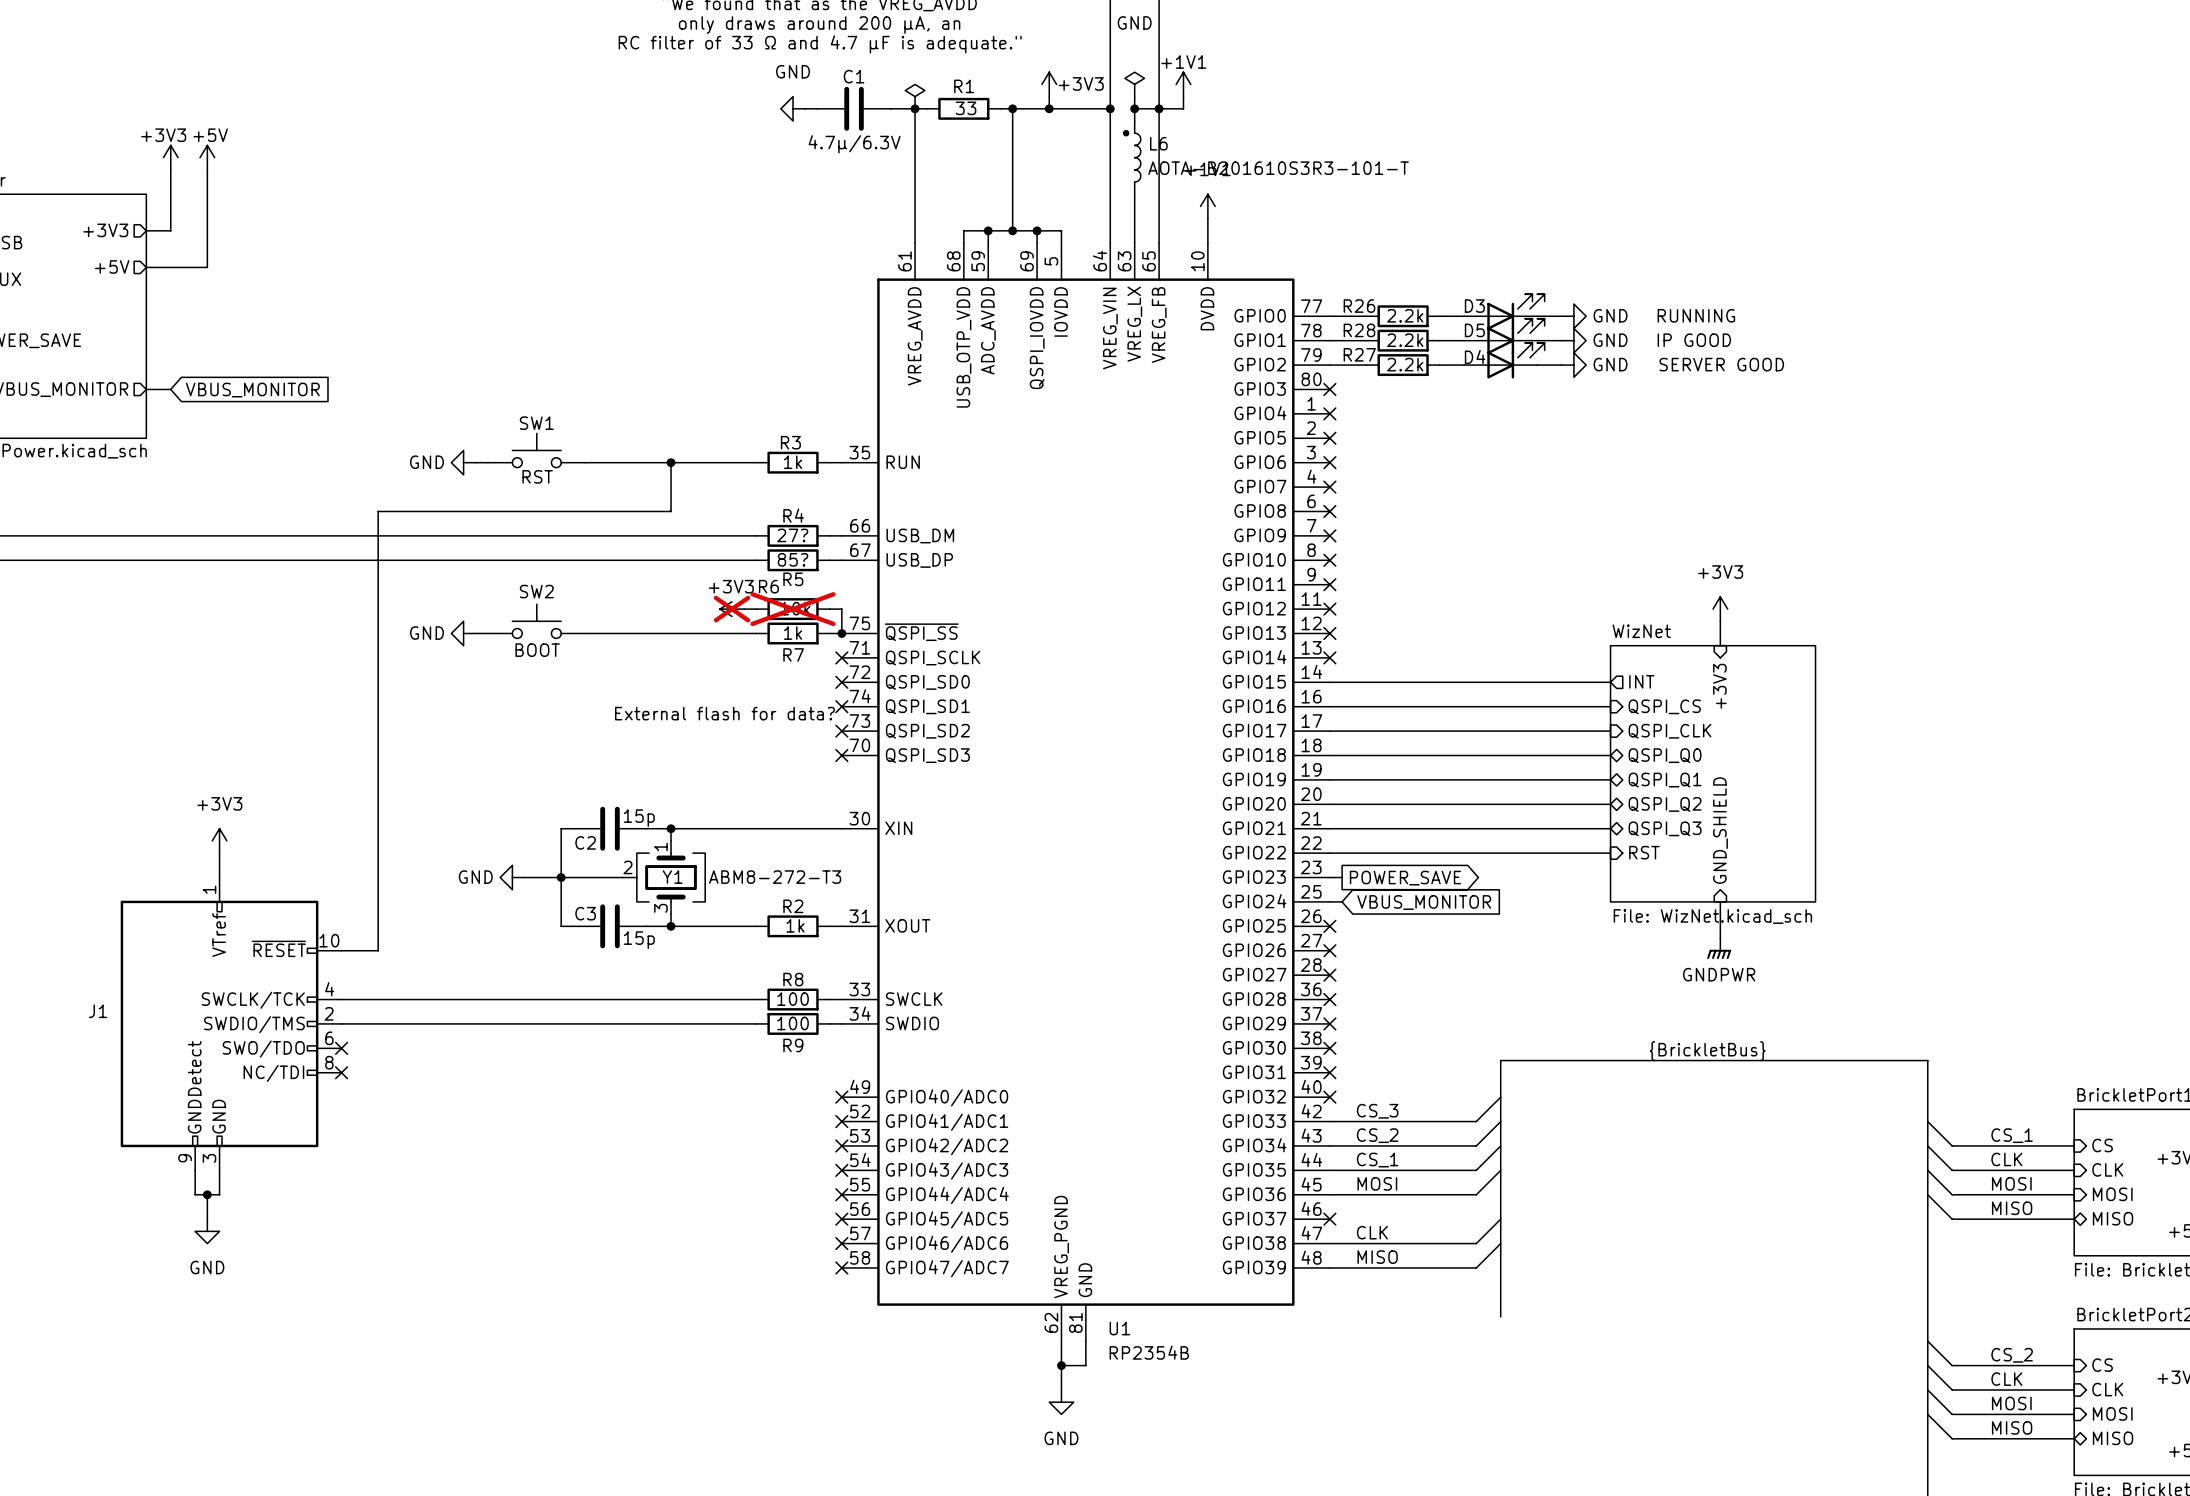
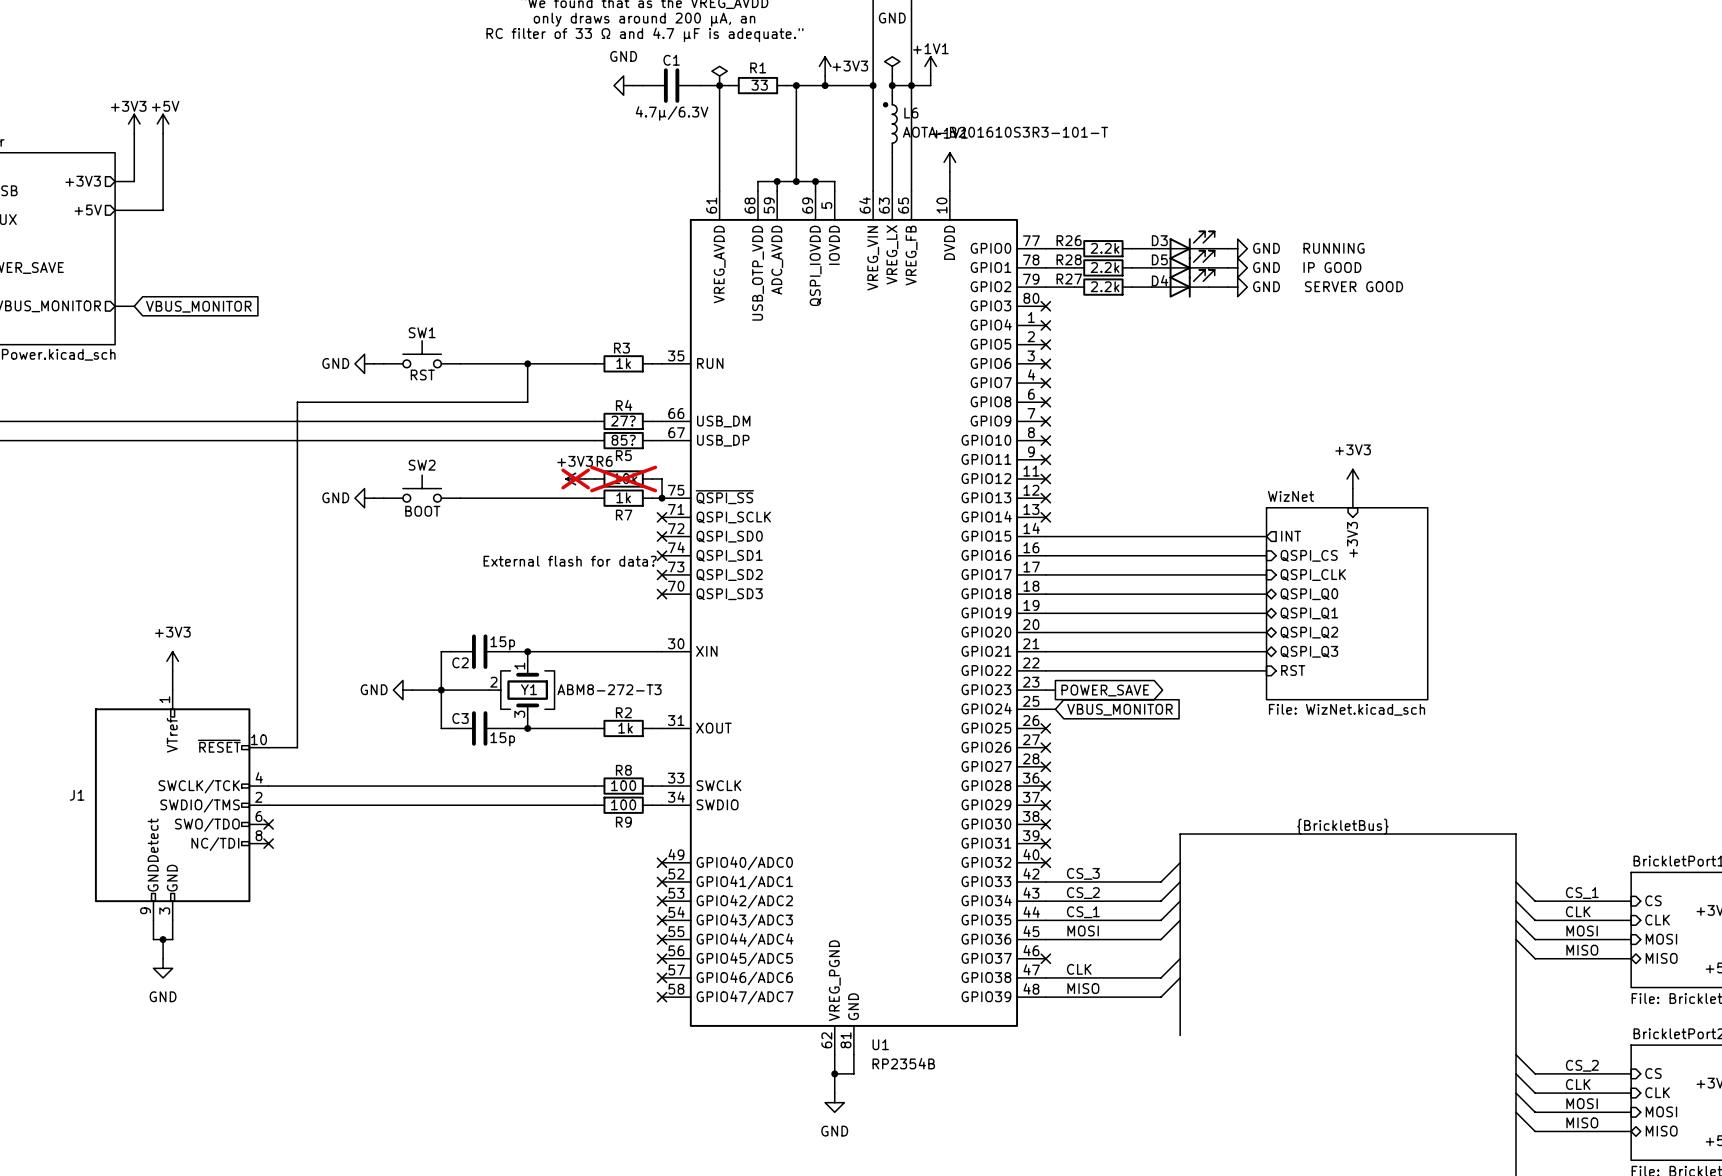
sheet WizNet shape: [1609, 644, 1817, 903] -> [1265, 507, 1429, 701]
sheet pin: GND_SHIELD (1720, 830) -> none
wire: (1720, 901) (1720, 938) -> none
power symbol: GNDPWR (1719, 948) -> none

